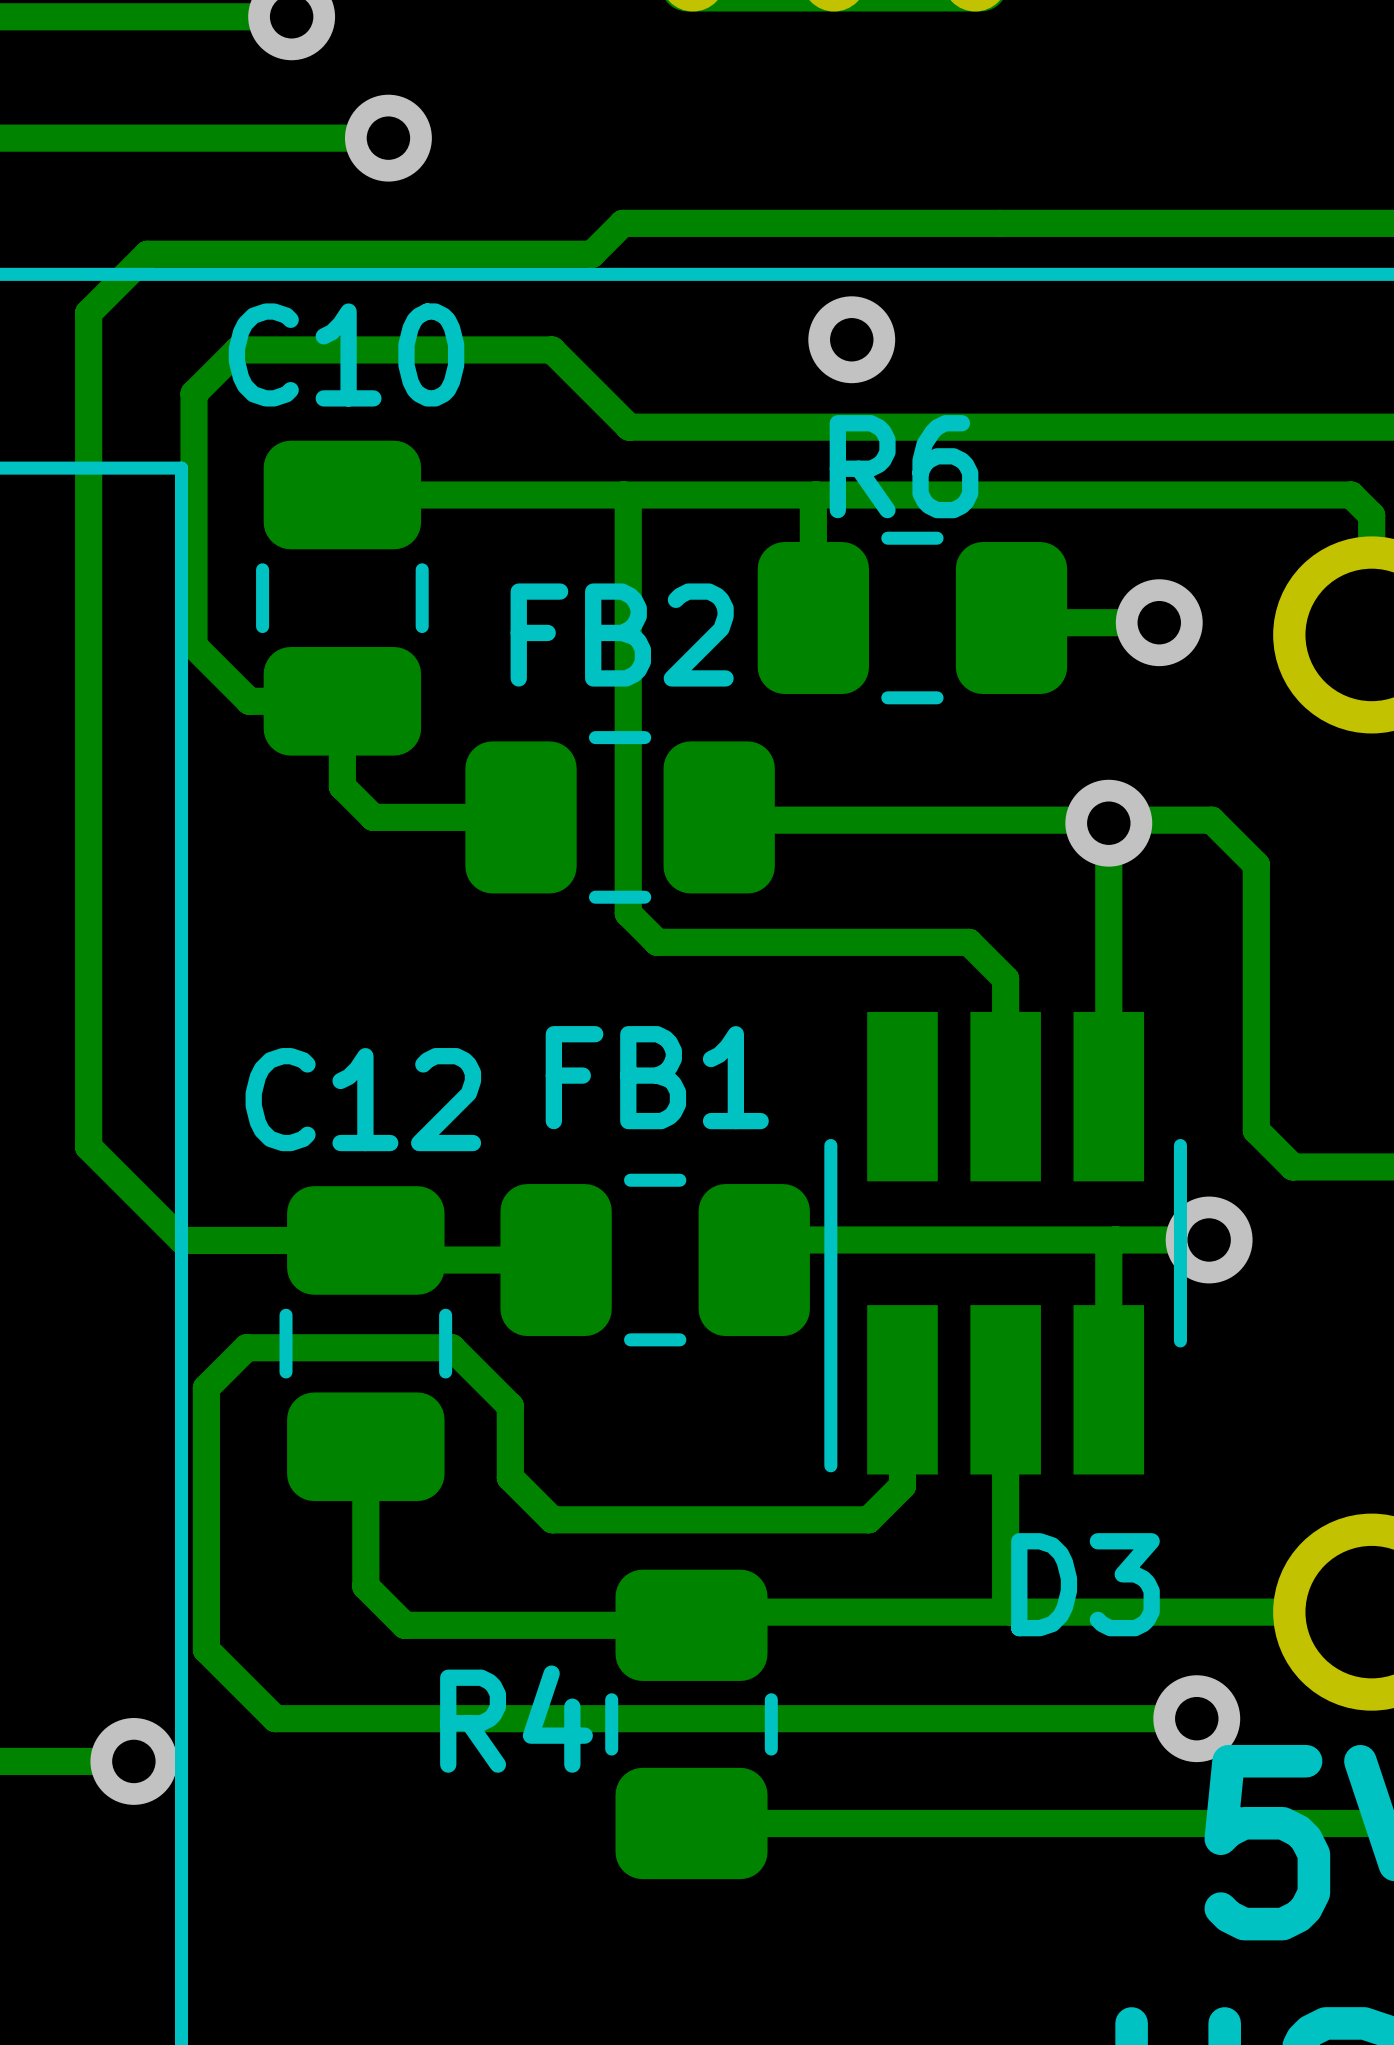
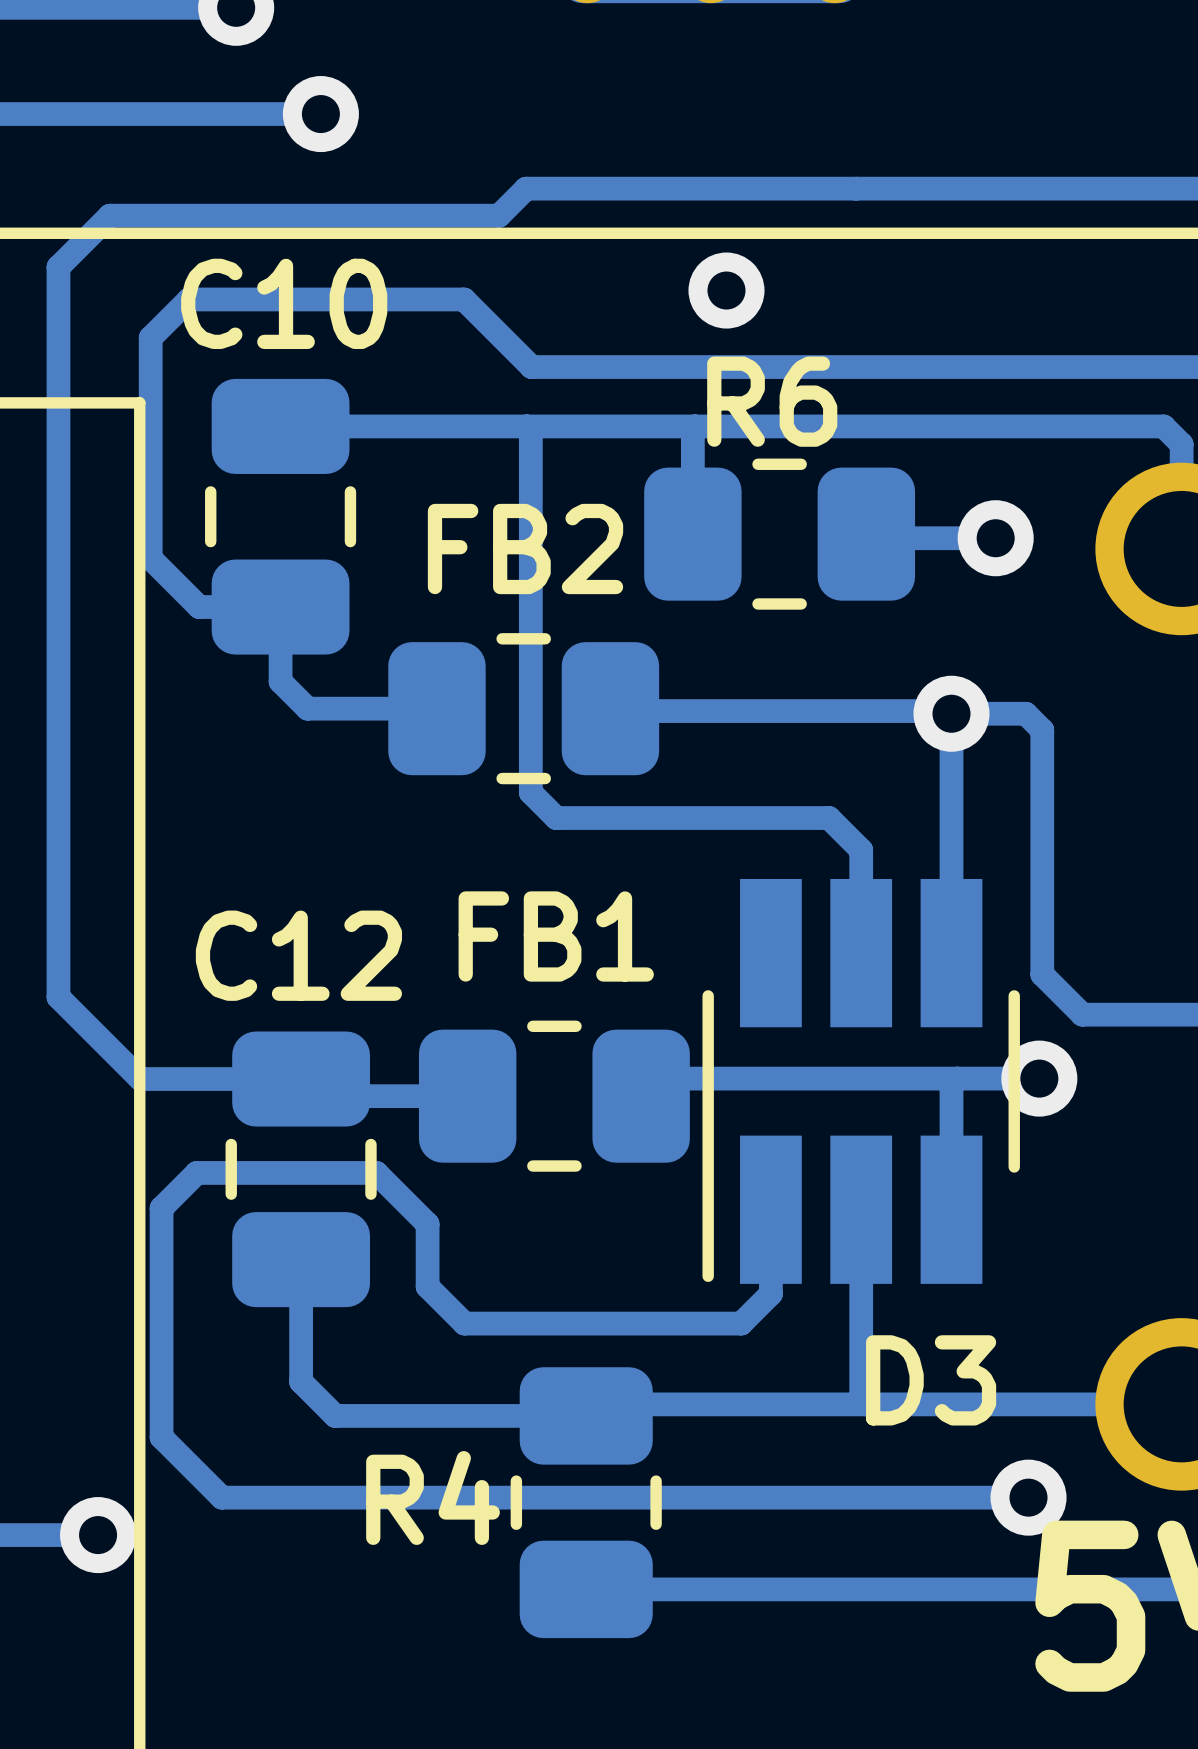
track: (1105, 820) (1211, 820) (1256, 864) (1256, 1130) (1292, 1166) -> (951, 713) (1025, 713) (1042, 730) (1042, 974) (1082, 1014) (1112, 1014)

